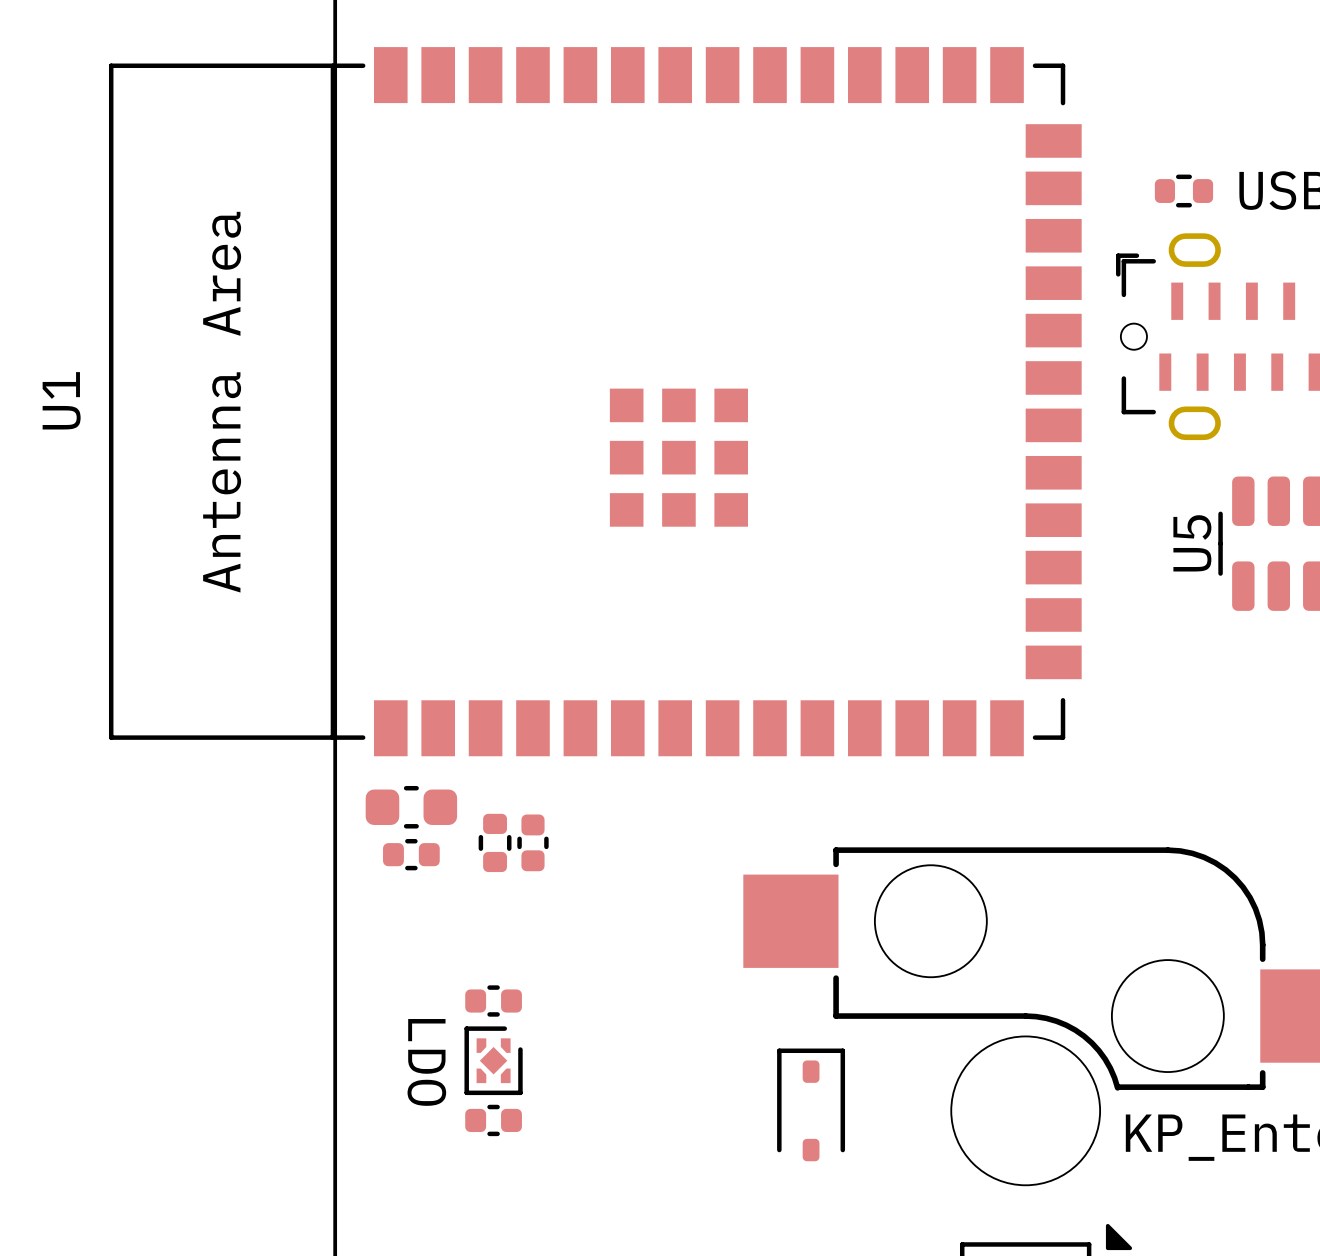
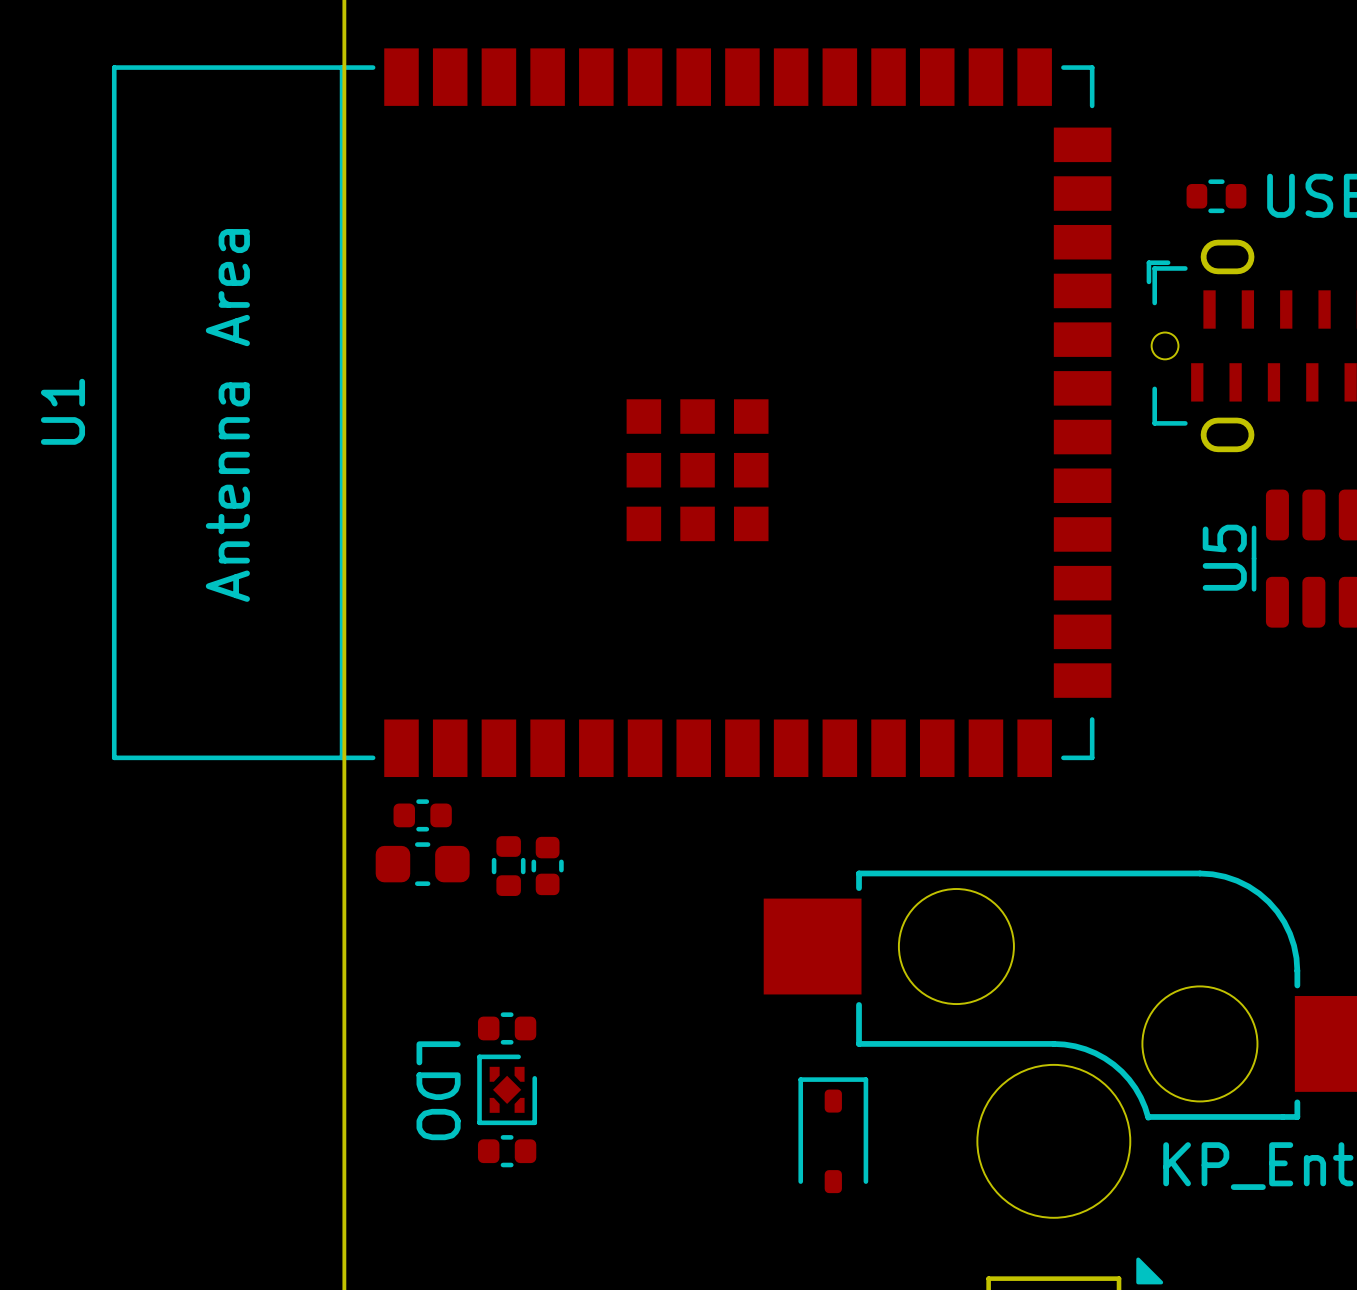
part footprint: [365, 785, 458, 829] -> [393, 799, 452, 832]
part footprint: [383, 838, 440, 871] -> [375, 842, 470, 886]

